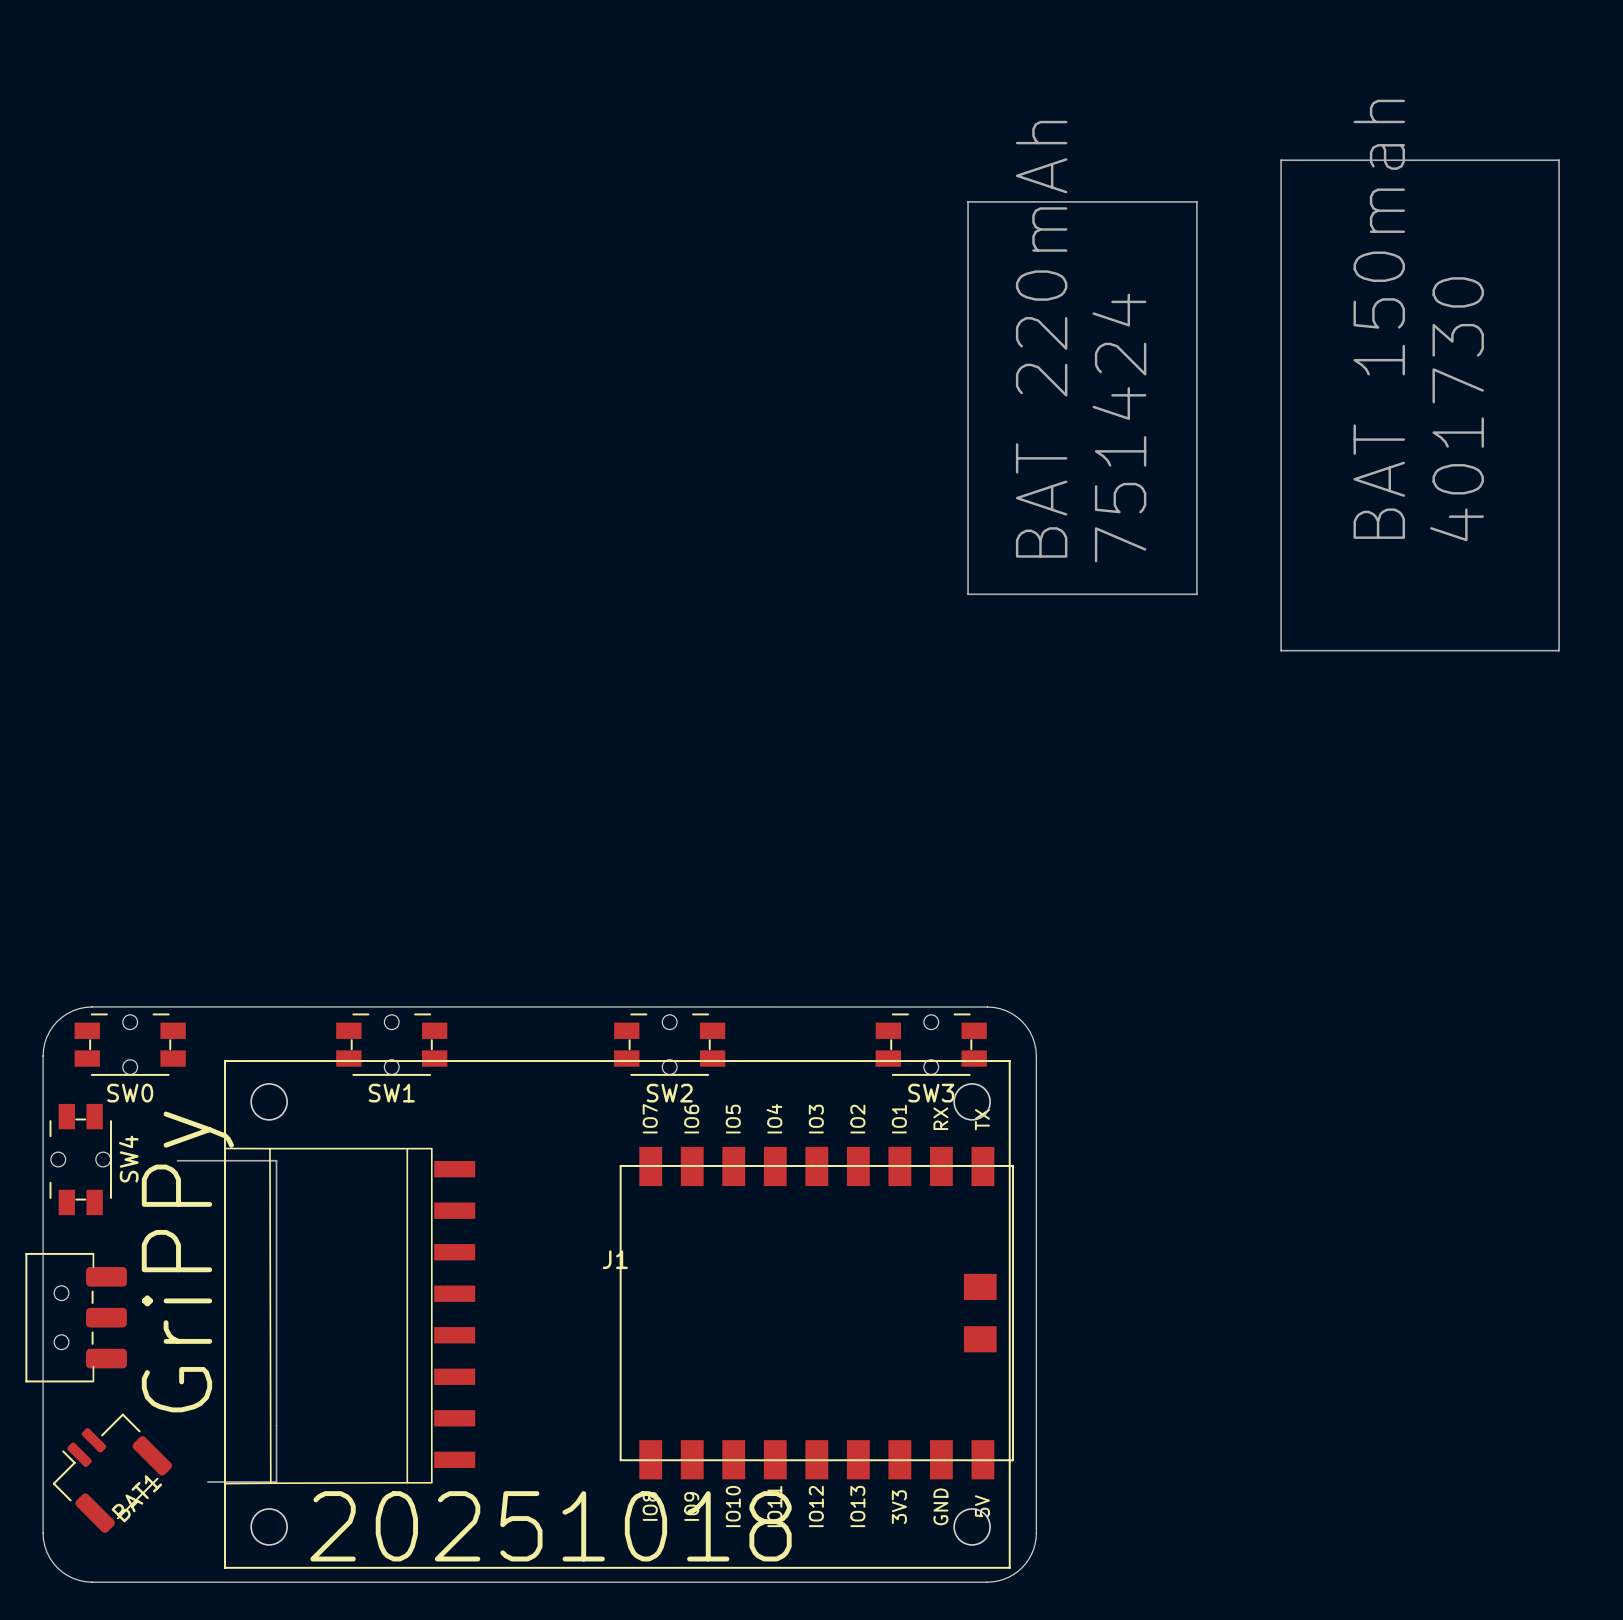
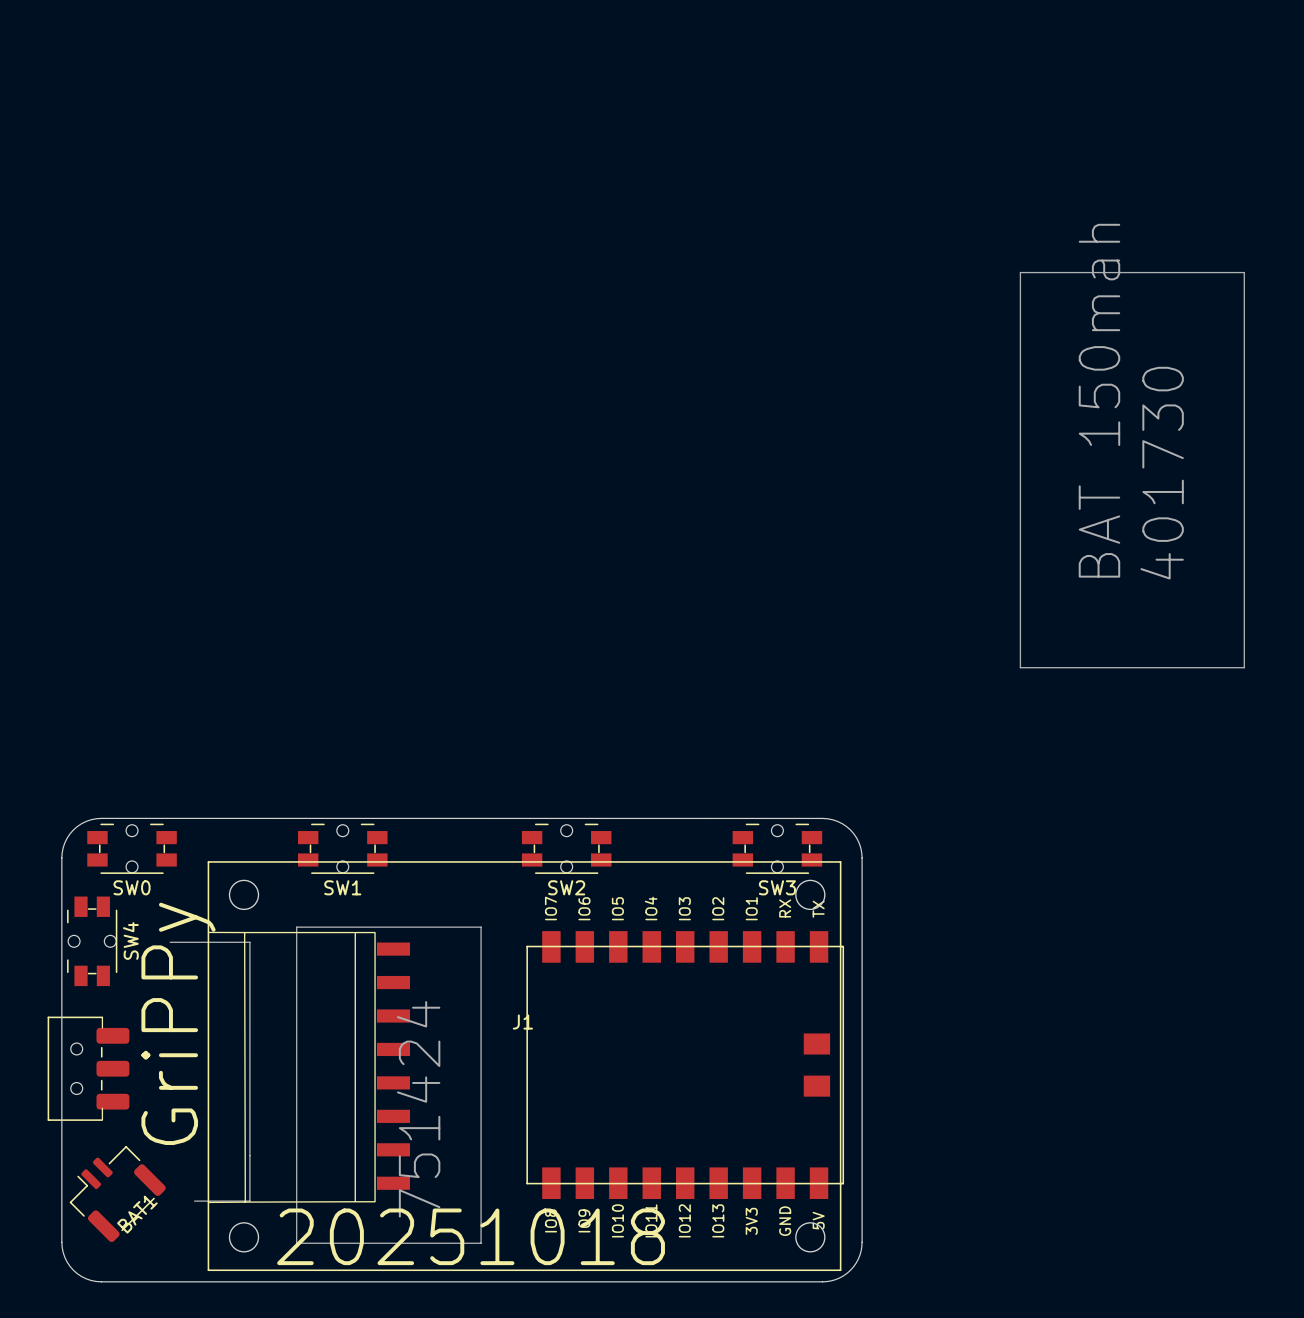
line: (1281, 160) (1559, 160) (1559, 650) (1281, 650) (1281, 160) -> (1020, 272) (1244, 272) (1244, 667) (1020, 667) (1020, 272)
line: (968, 201) (1196, 201) (1196, 594) (968, 594) (968, 201) -> none
text position: BAT 150mah (1379, 319) -> BAT 150mah (1099, 400)
text: BAT 220mAh (1041, 339) -> none
text position: 401730 (1457, 409) -> 401730 (1162, 473)
text: 751424 (1119, 428) -> none
line: none -> (296, 927) (481, 927) (481, 1243) (296, 1243) (296, 927)
text: none -> 751424 (418, 1109)

